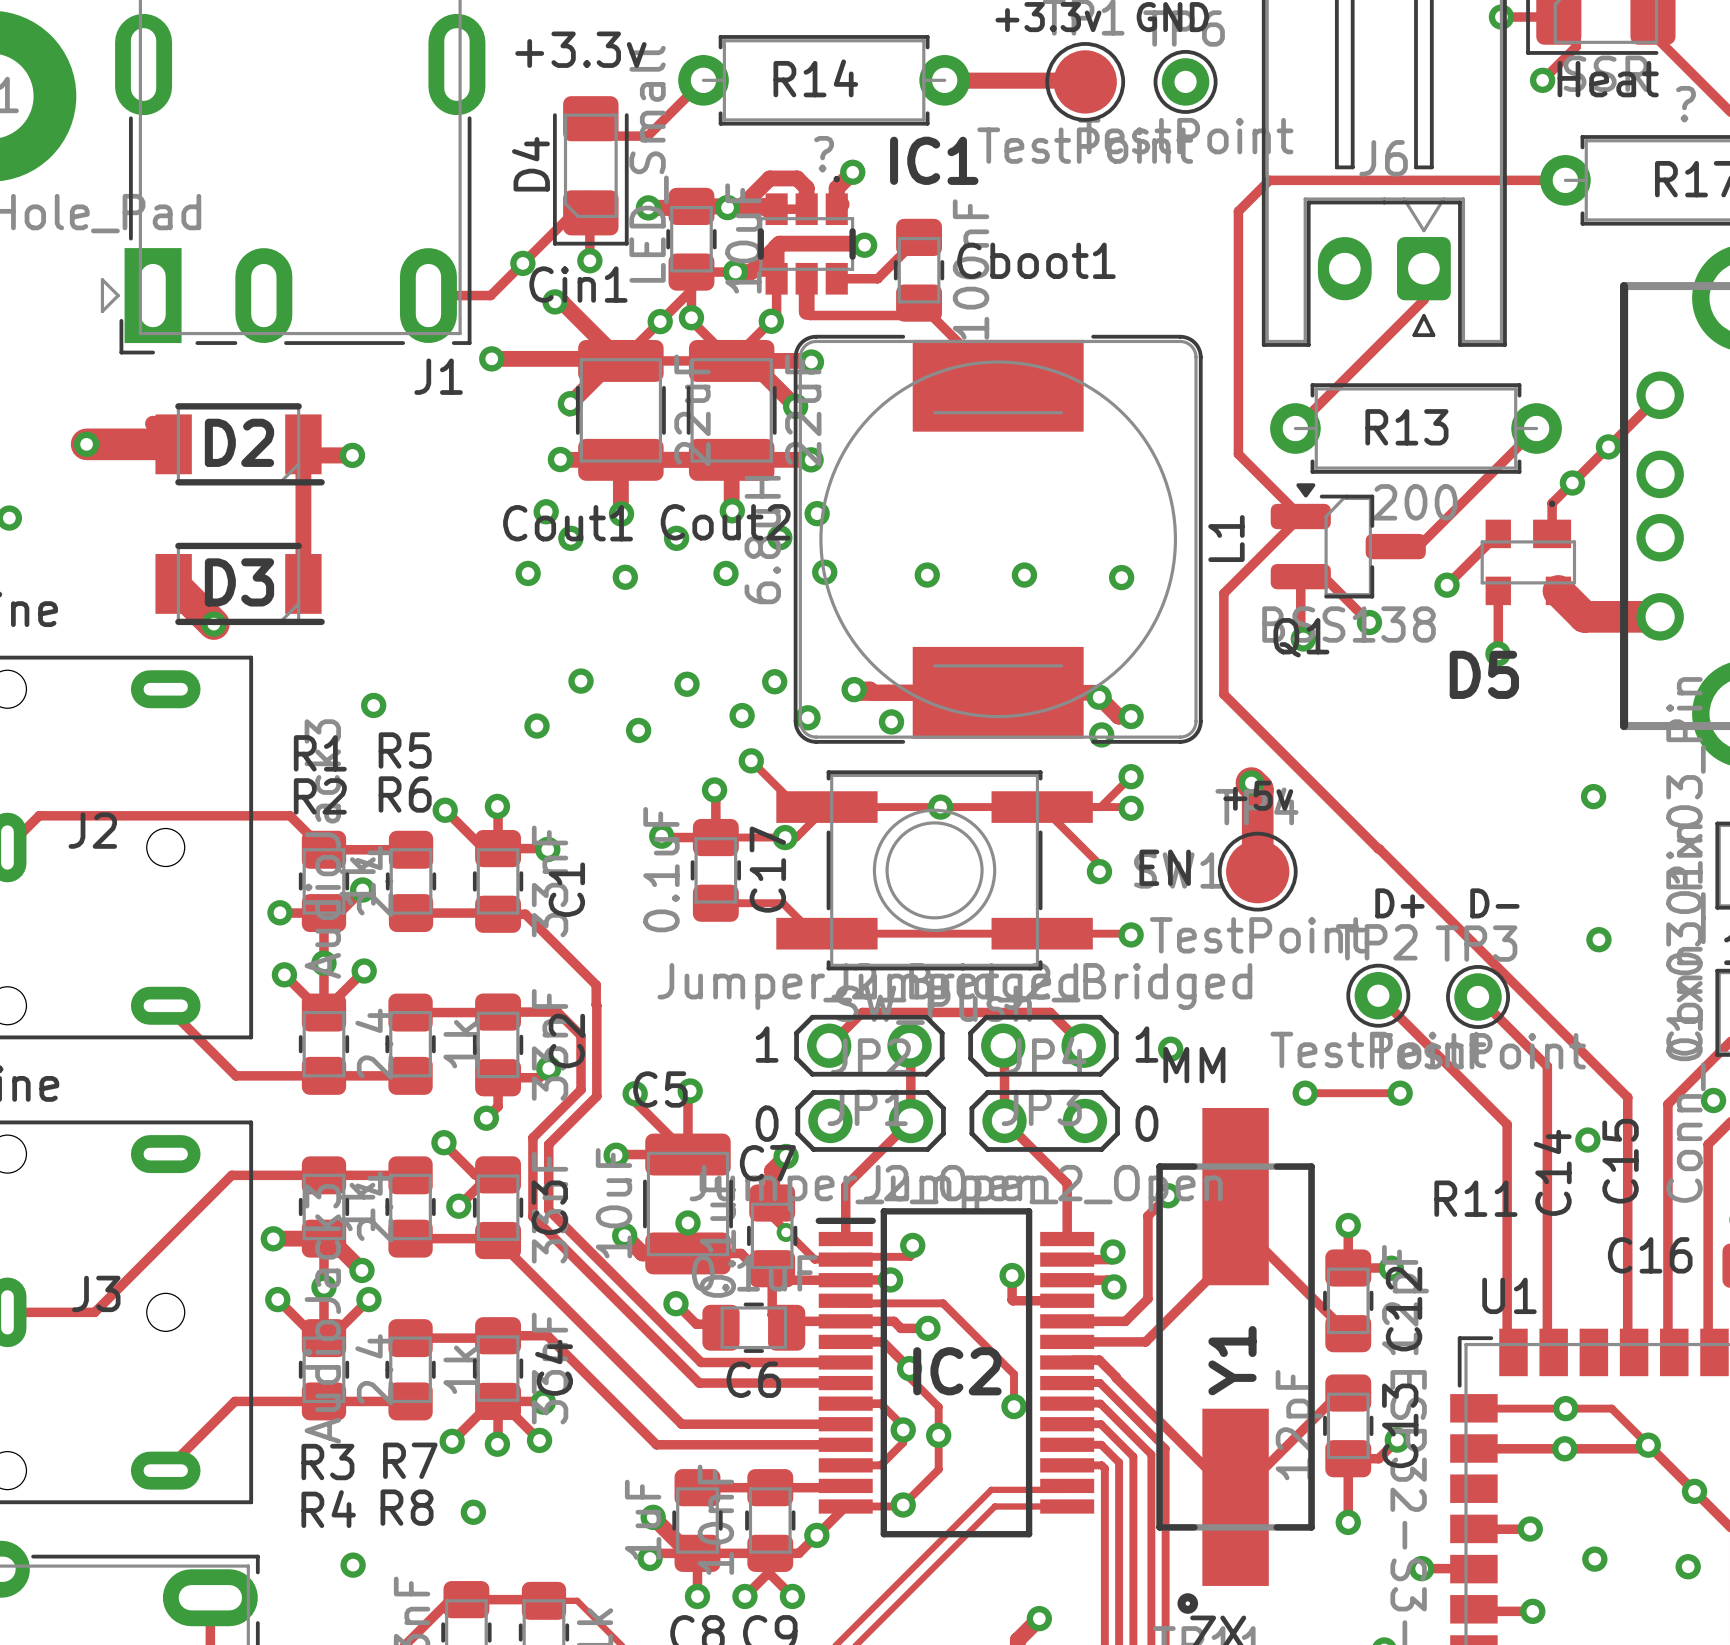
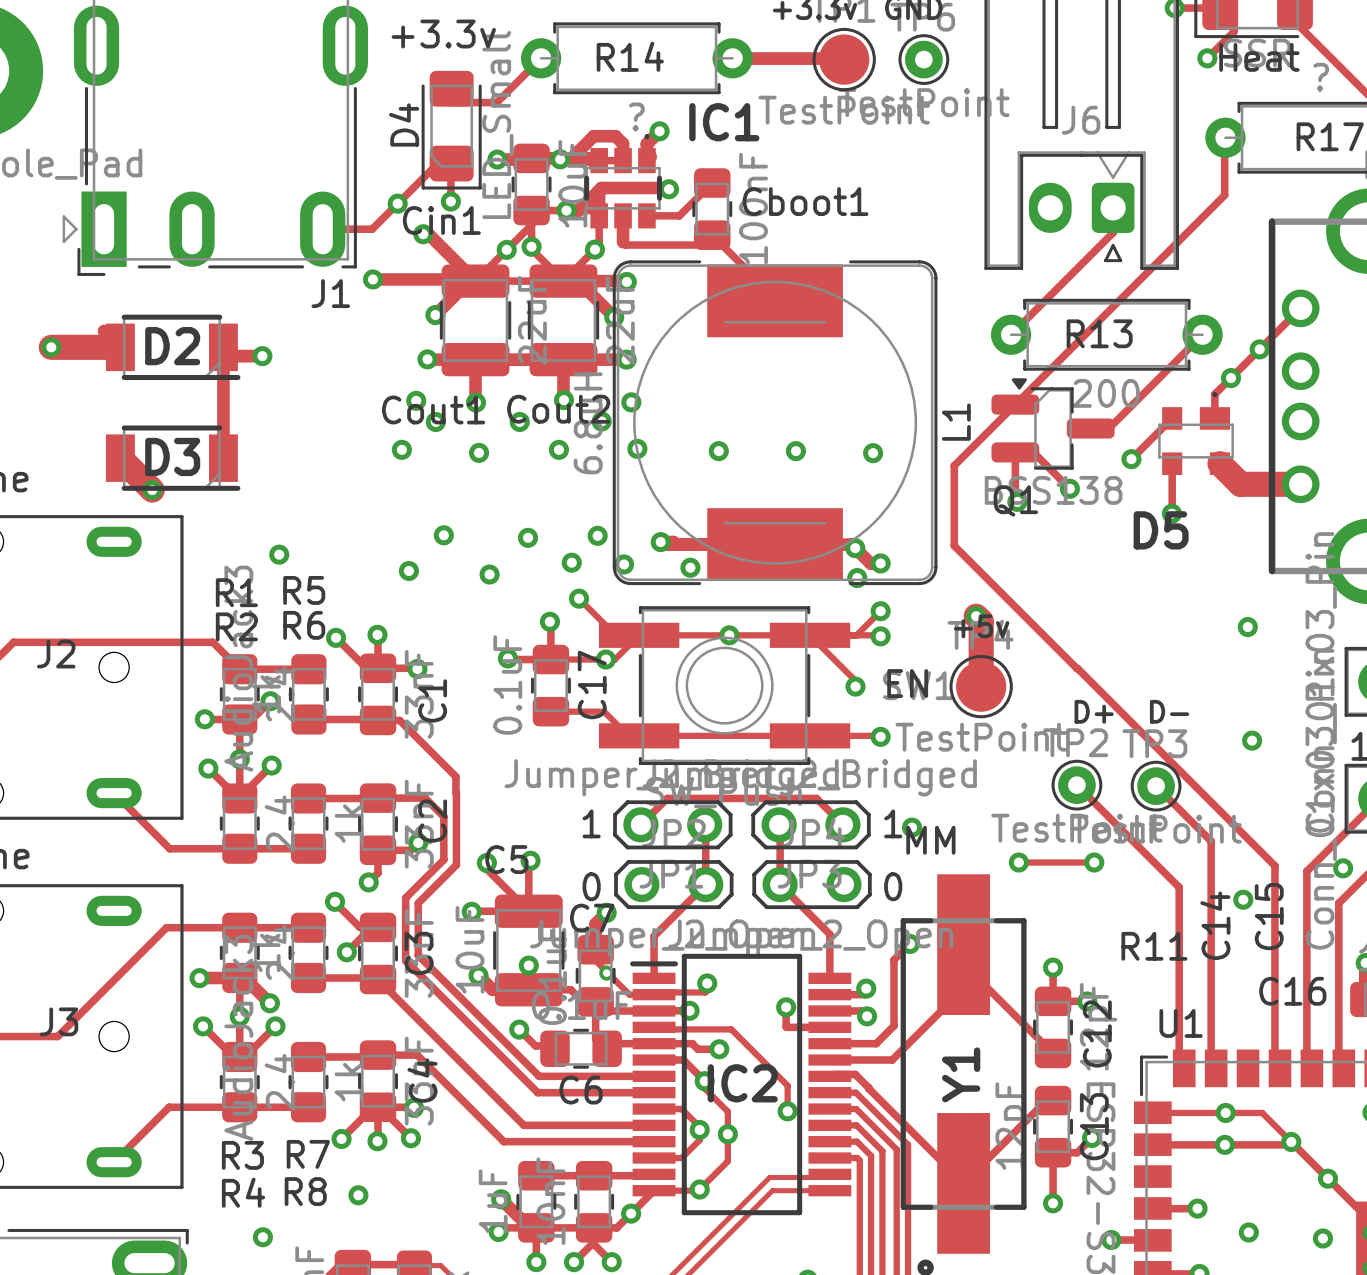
track: (1565, 180) (1269, 180) (1238, 211) (1238, 454) (1300, 516) -> (1224, 138) (1224, 195) (1015, 404)

